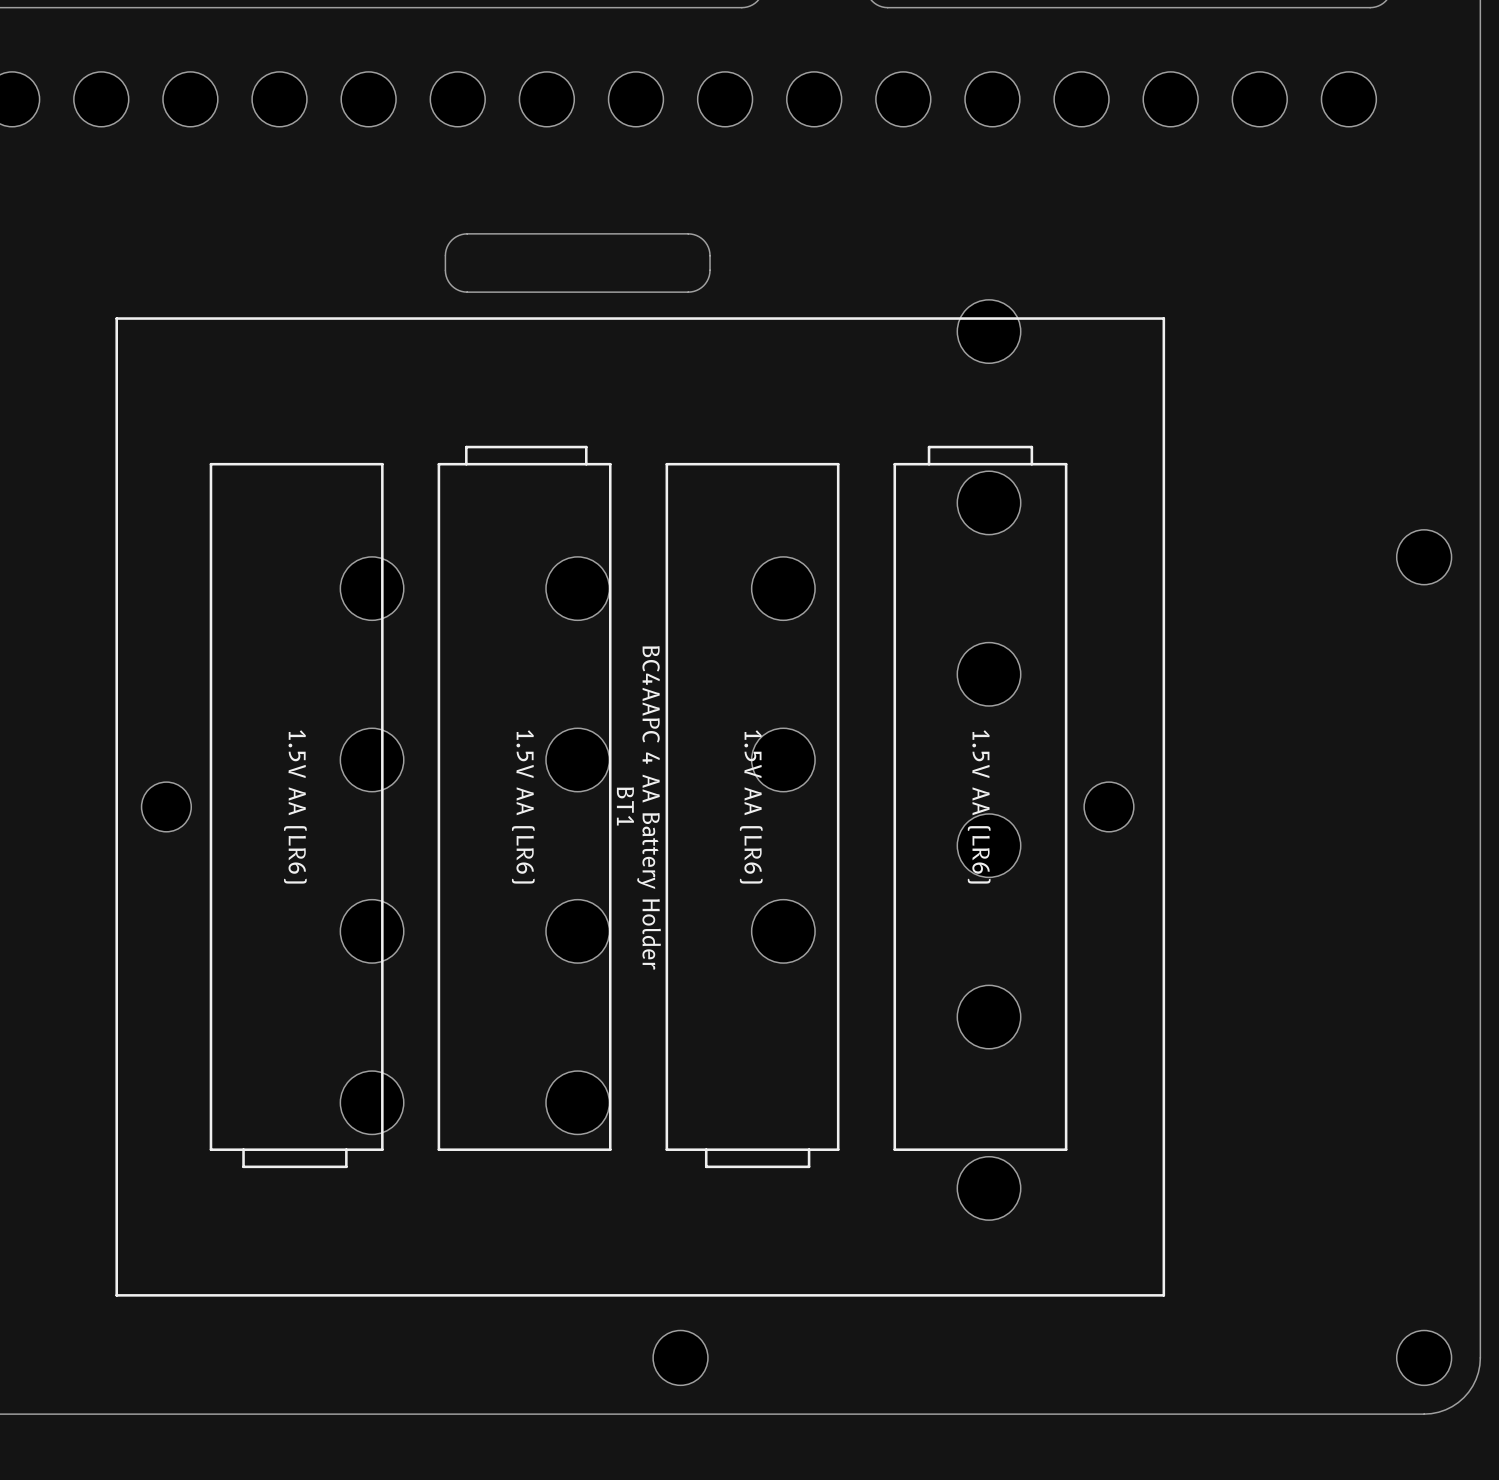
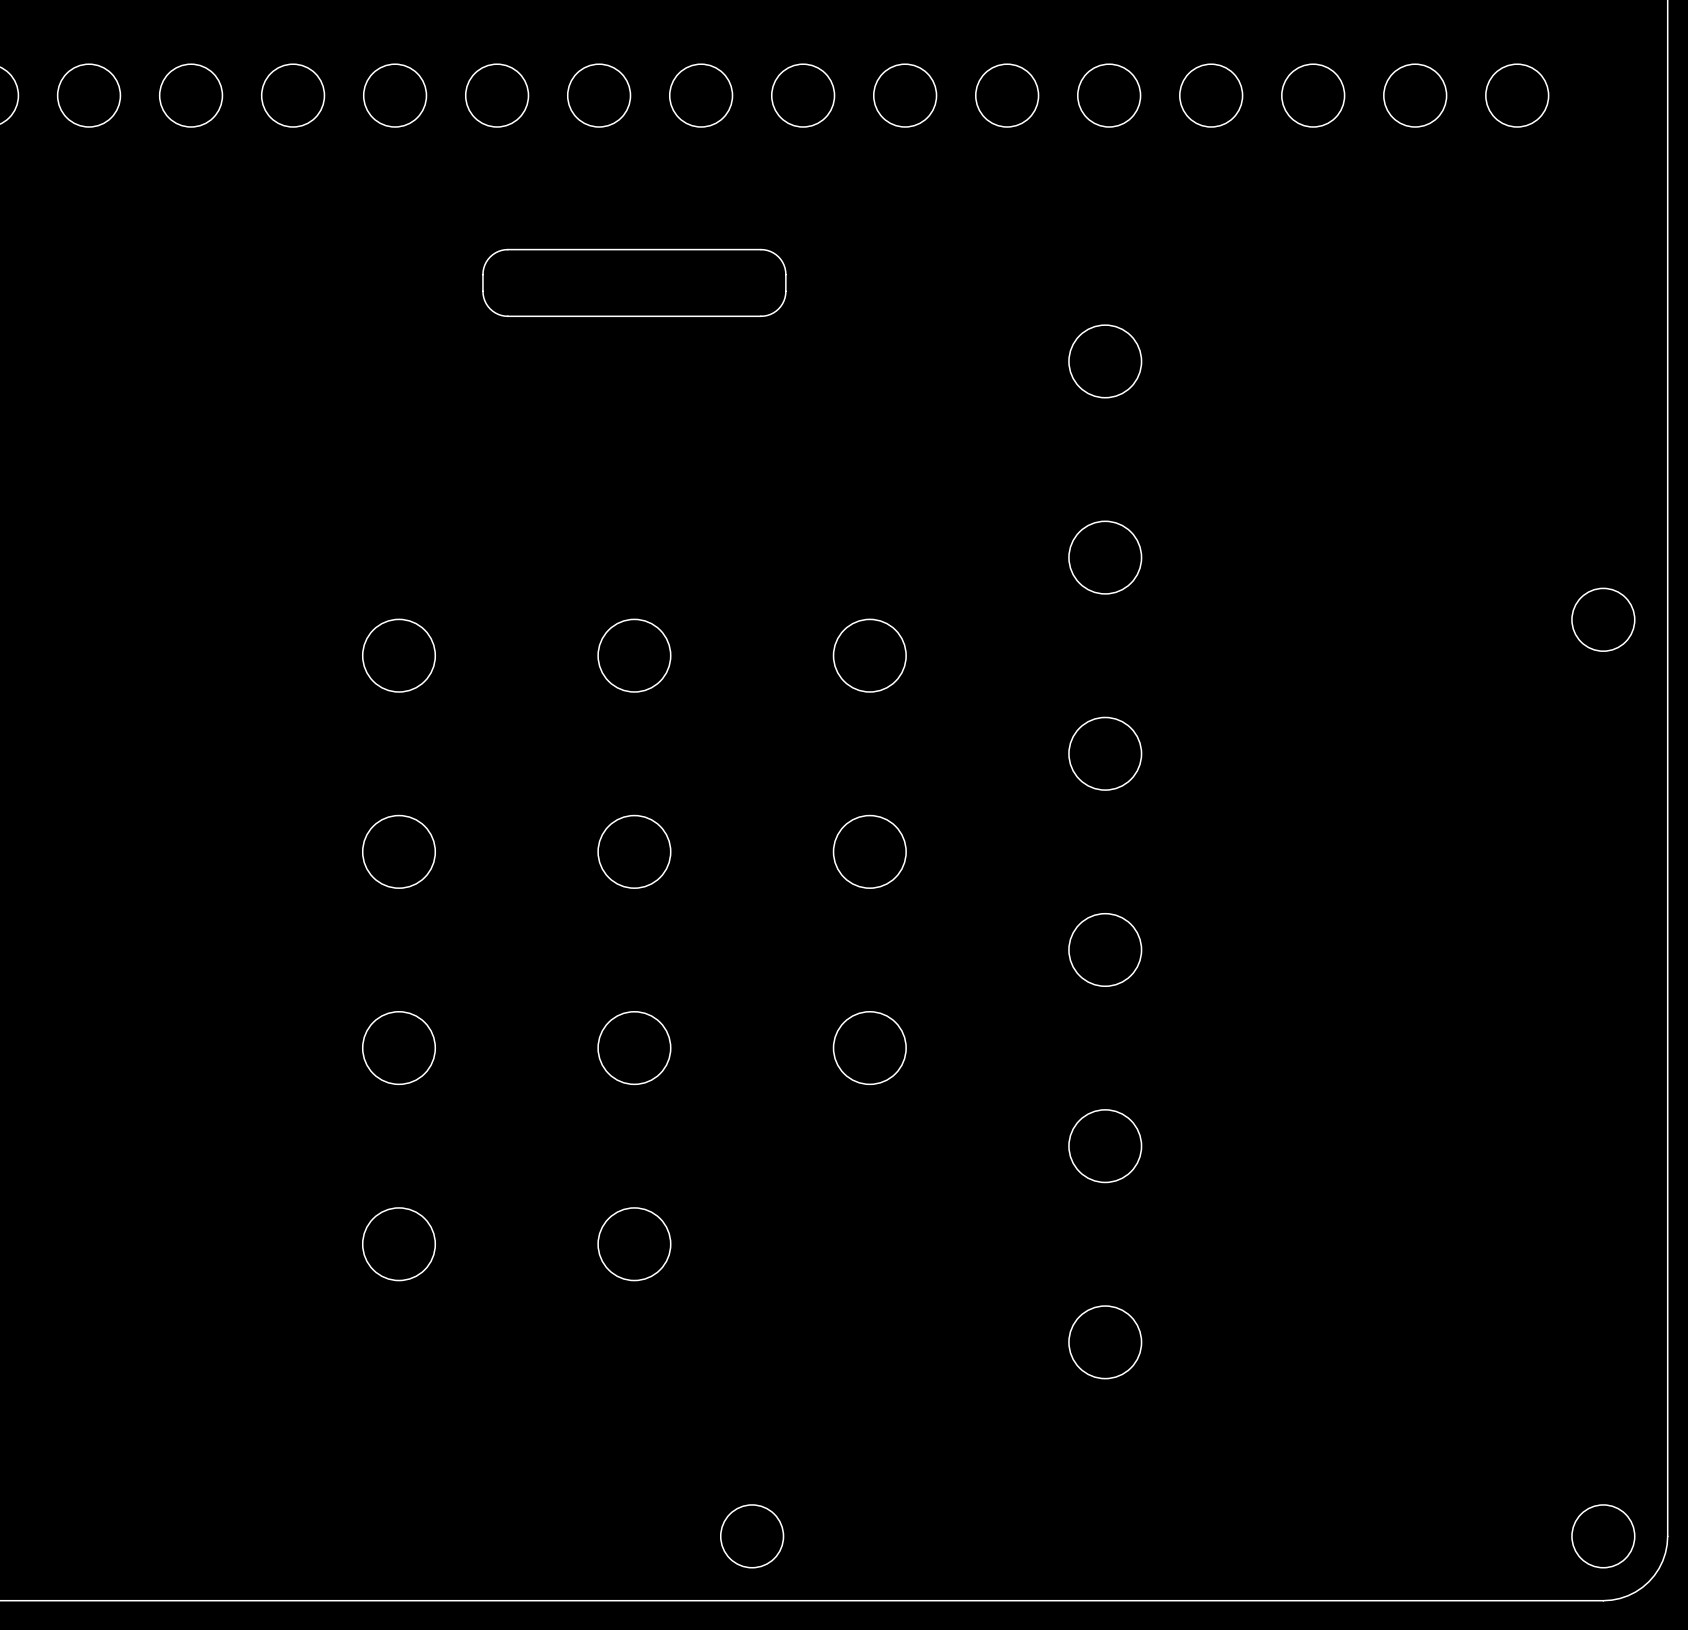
BT1: (640, 806) -> none

